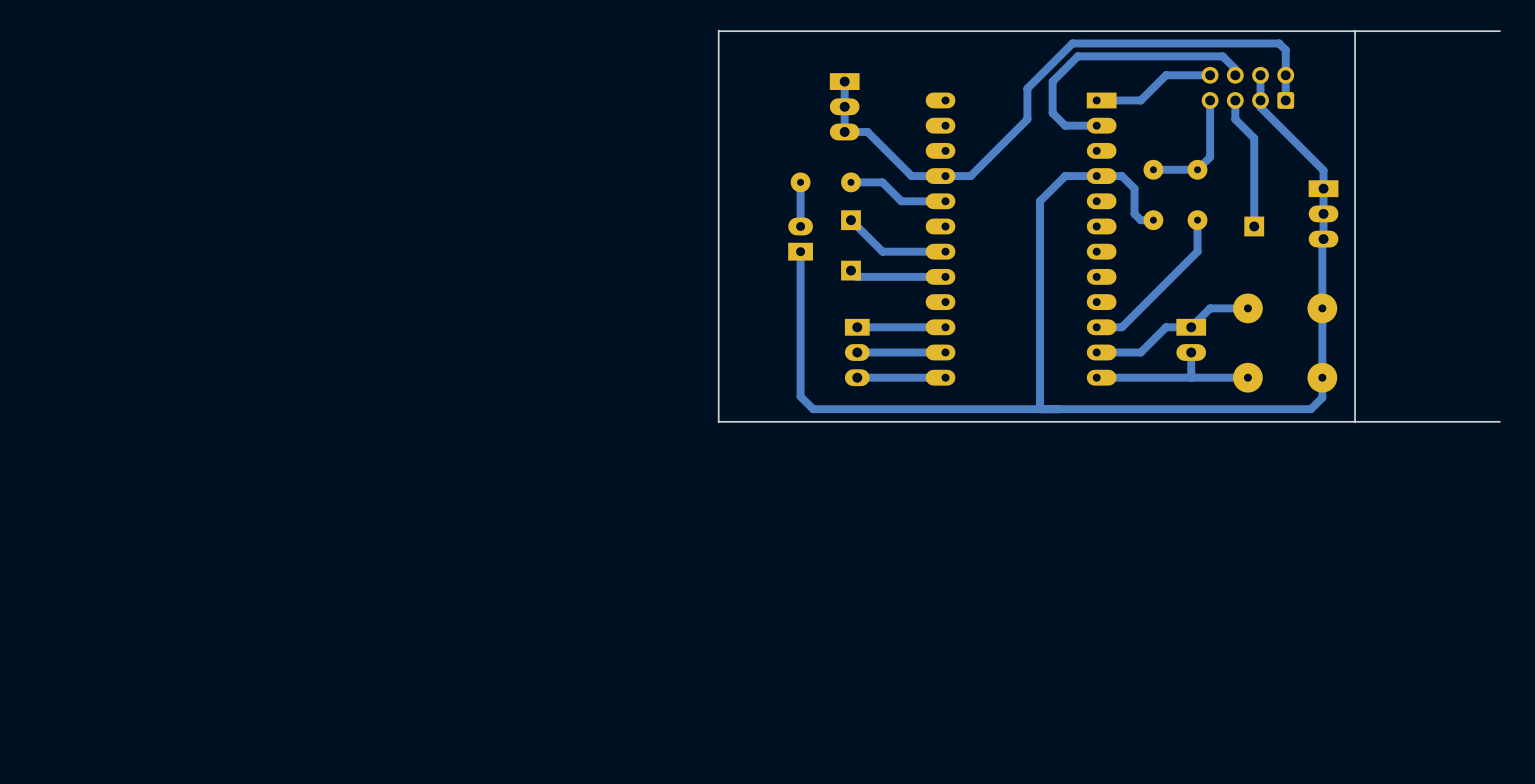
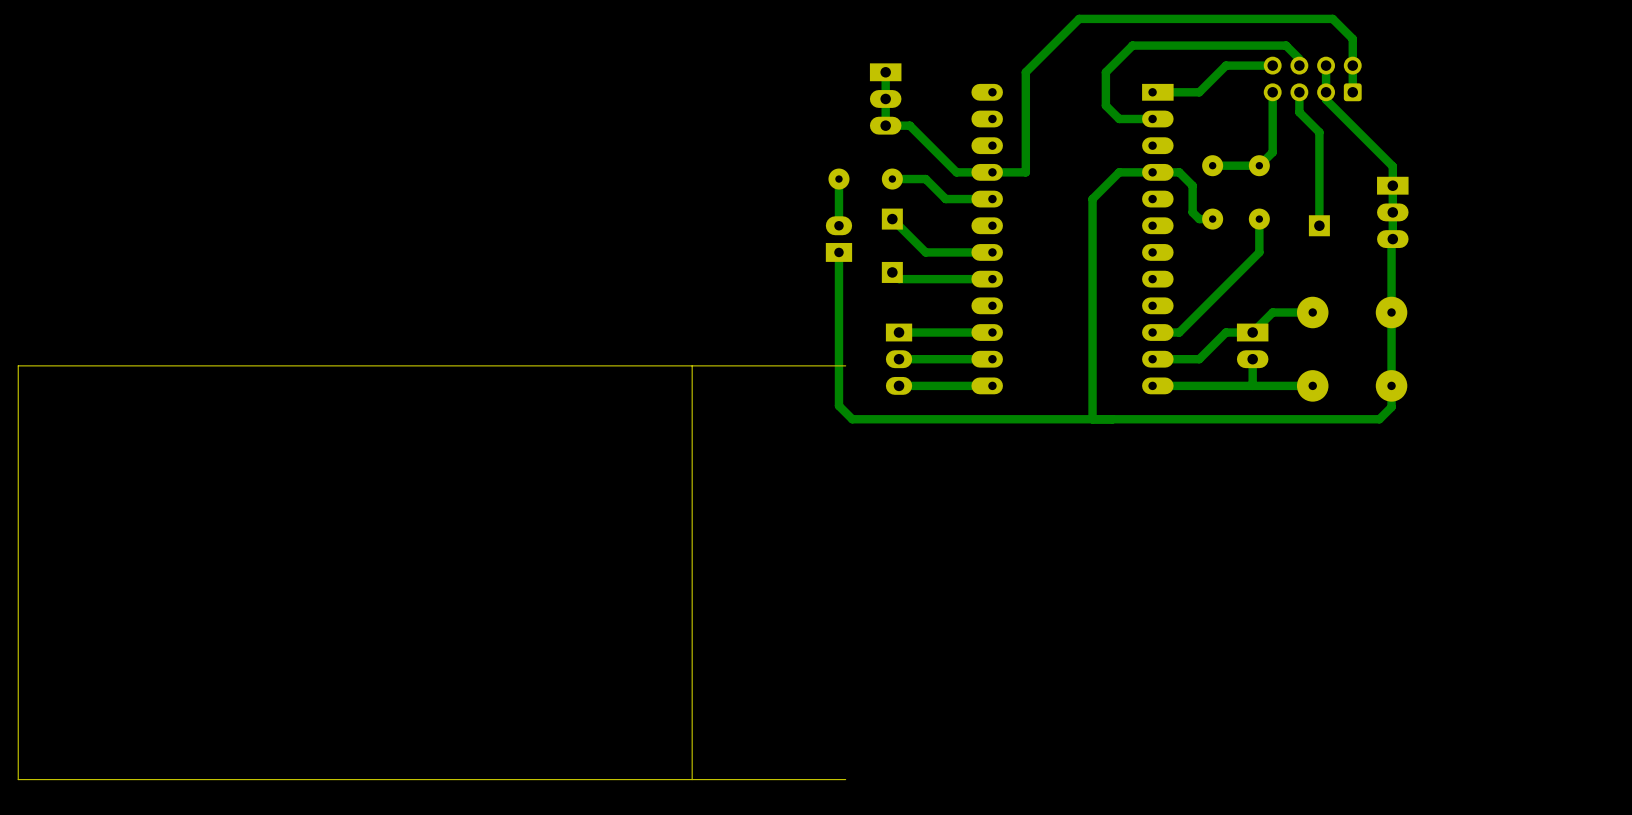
board edge: (1355, 31) (1355, 421) -> none
board edge: (1499, 31) (718, 31) (718, 421) (1499, 421) -> none
bottom track: (1279, 43) (1072, 43) (1027, 88) (1027, 119) (970, 176) -> (1345, 31) (1332, 18) (1079, 18) (1025, 72) (1025, 172) (1019, 172)
board edge: none -> (692, 365) (692, 779)
board edge: none -> (845, 365) (18, 365) (18, 779) (845, 779)

